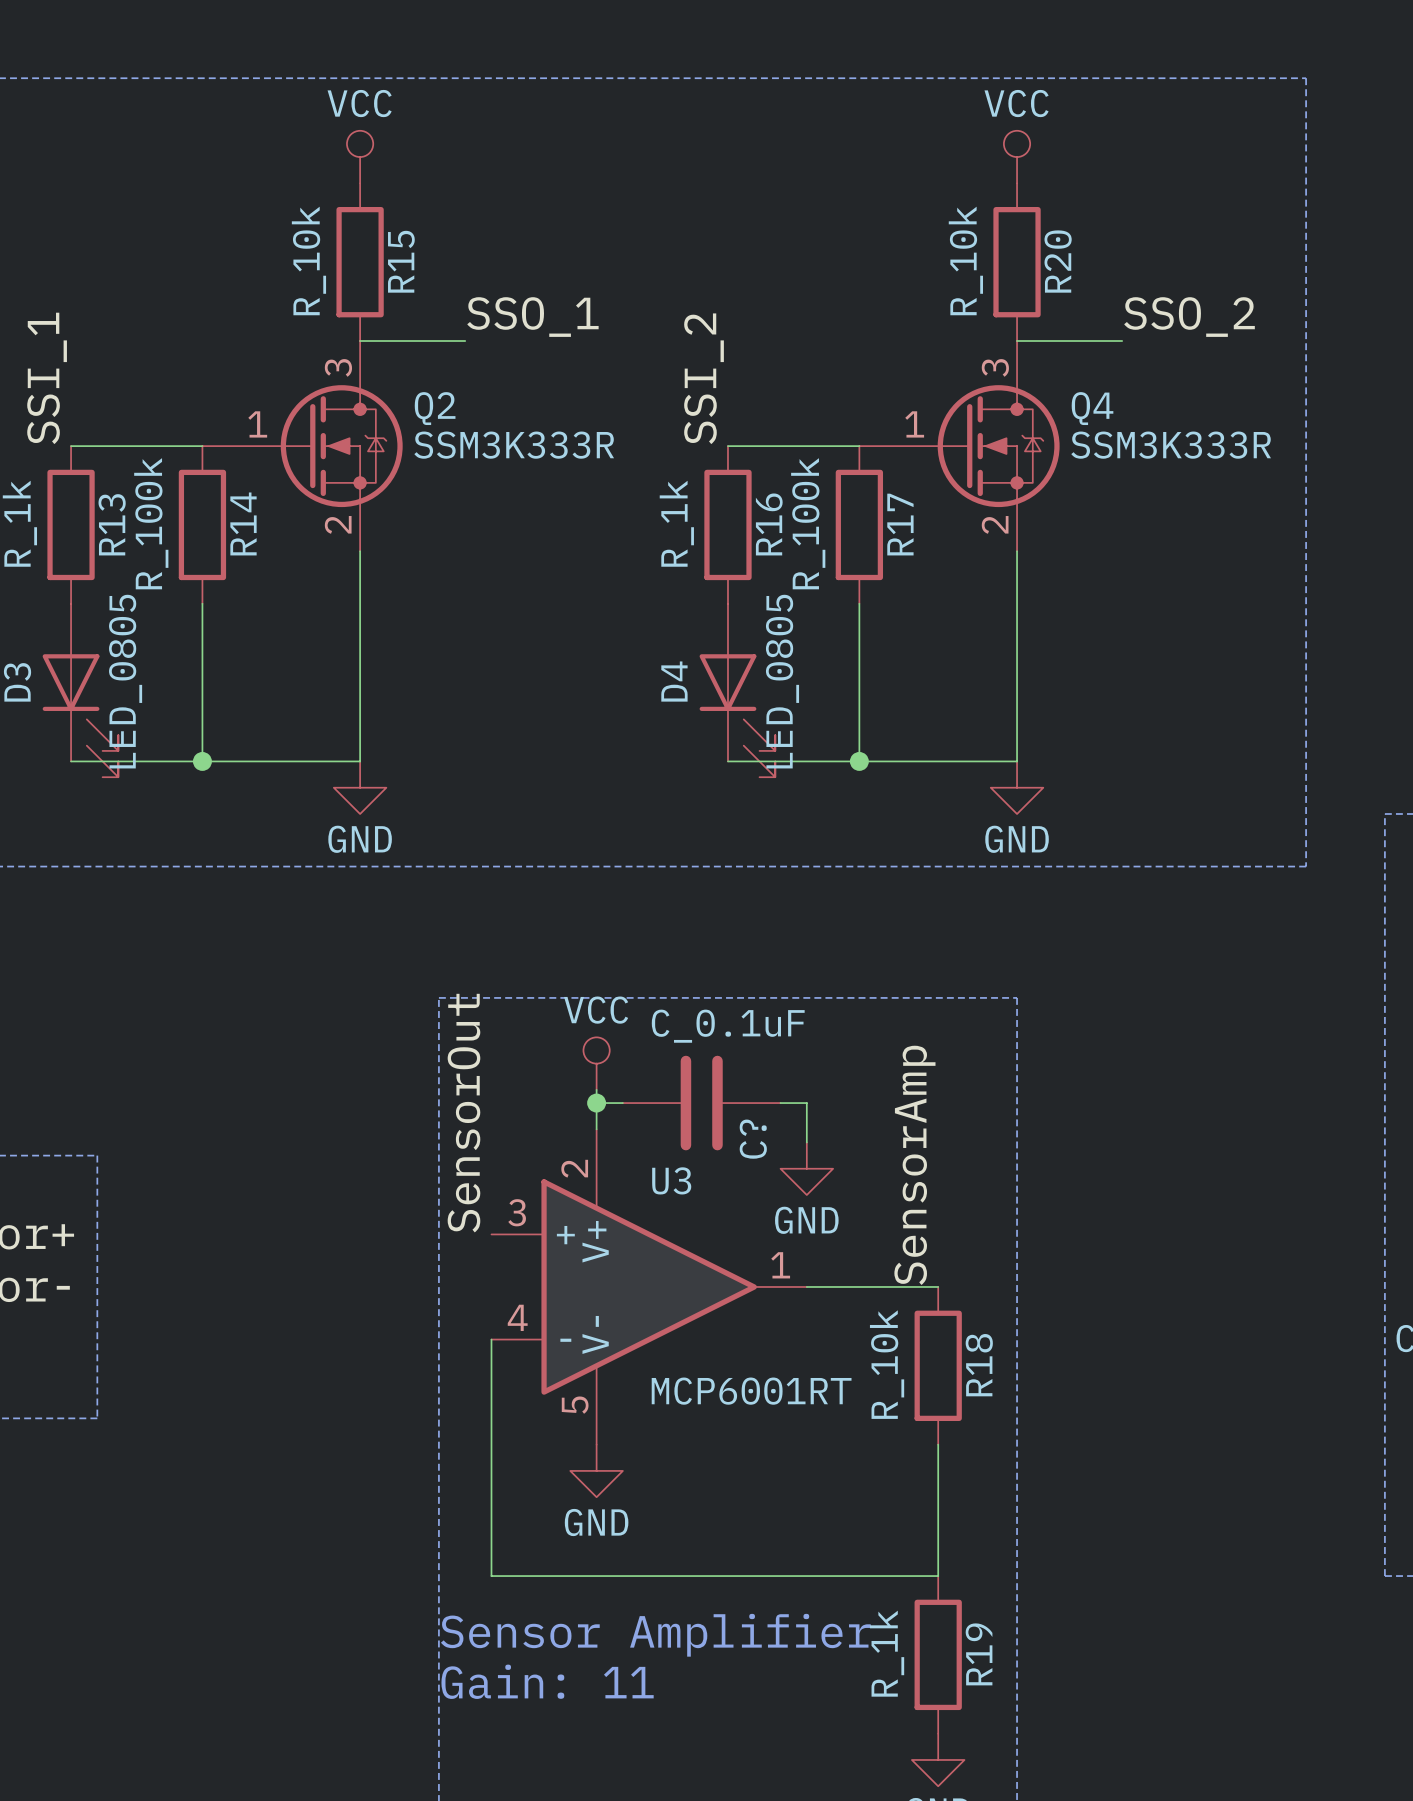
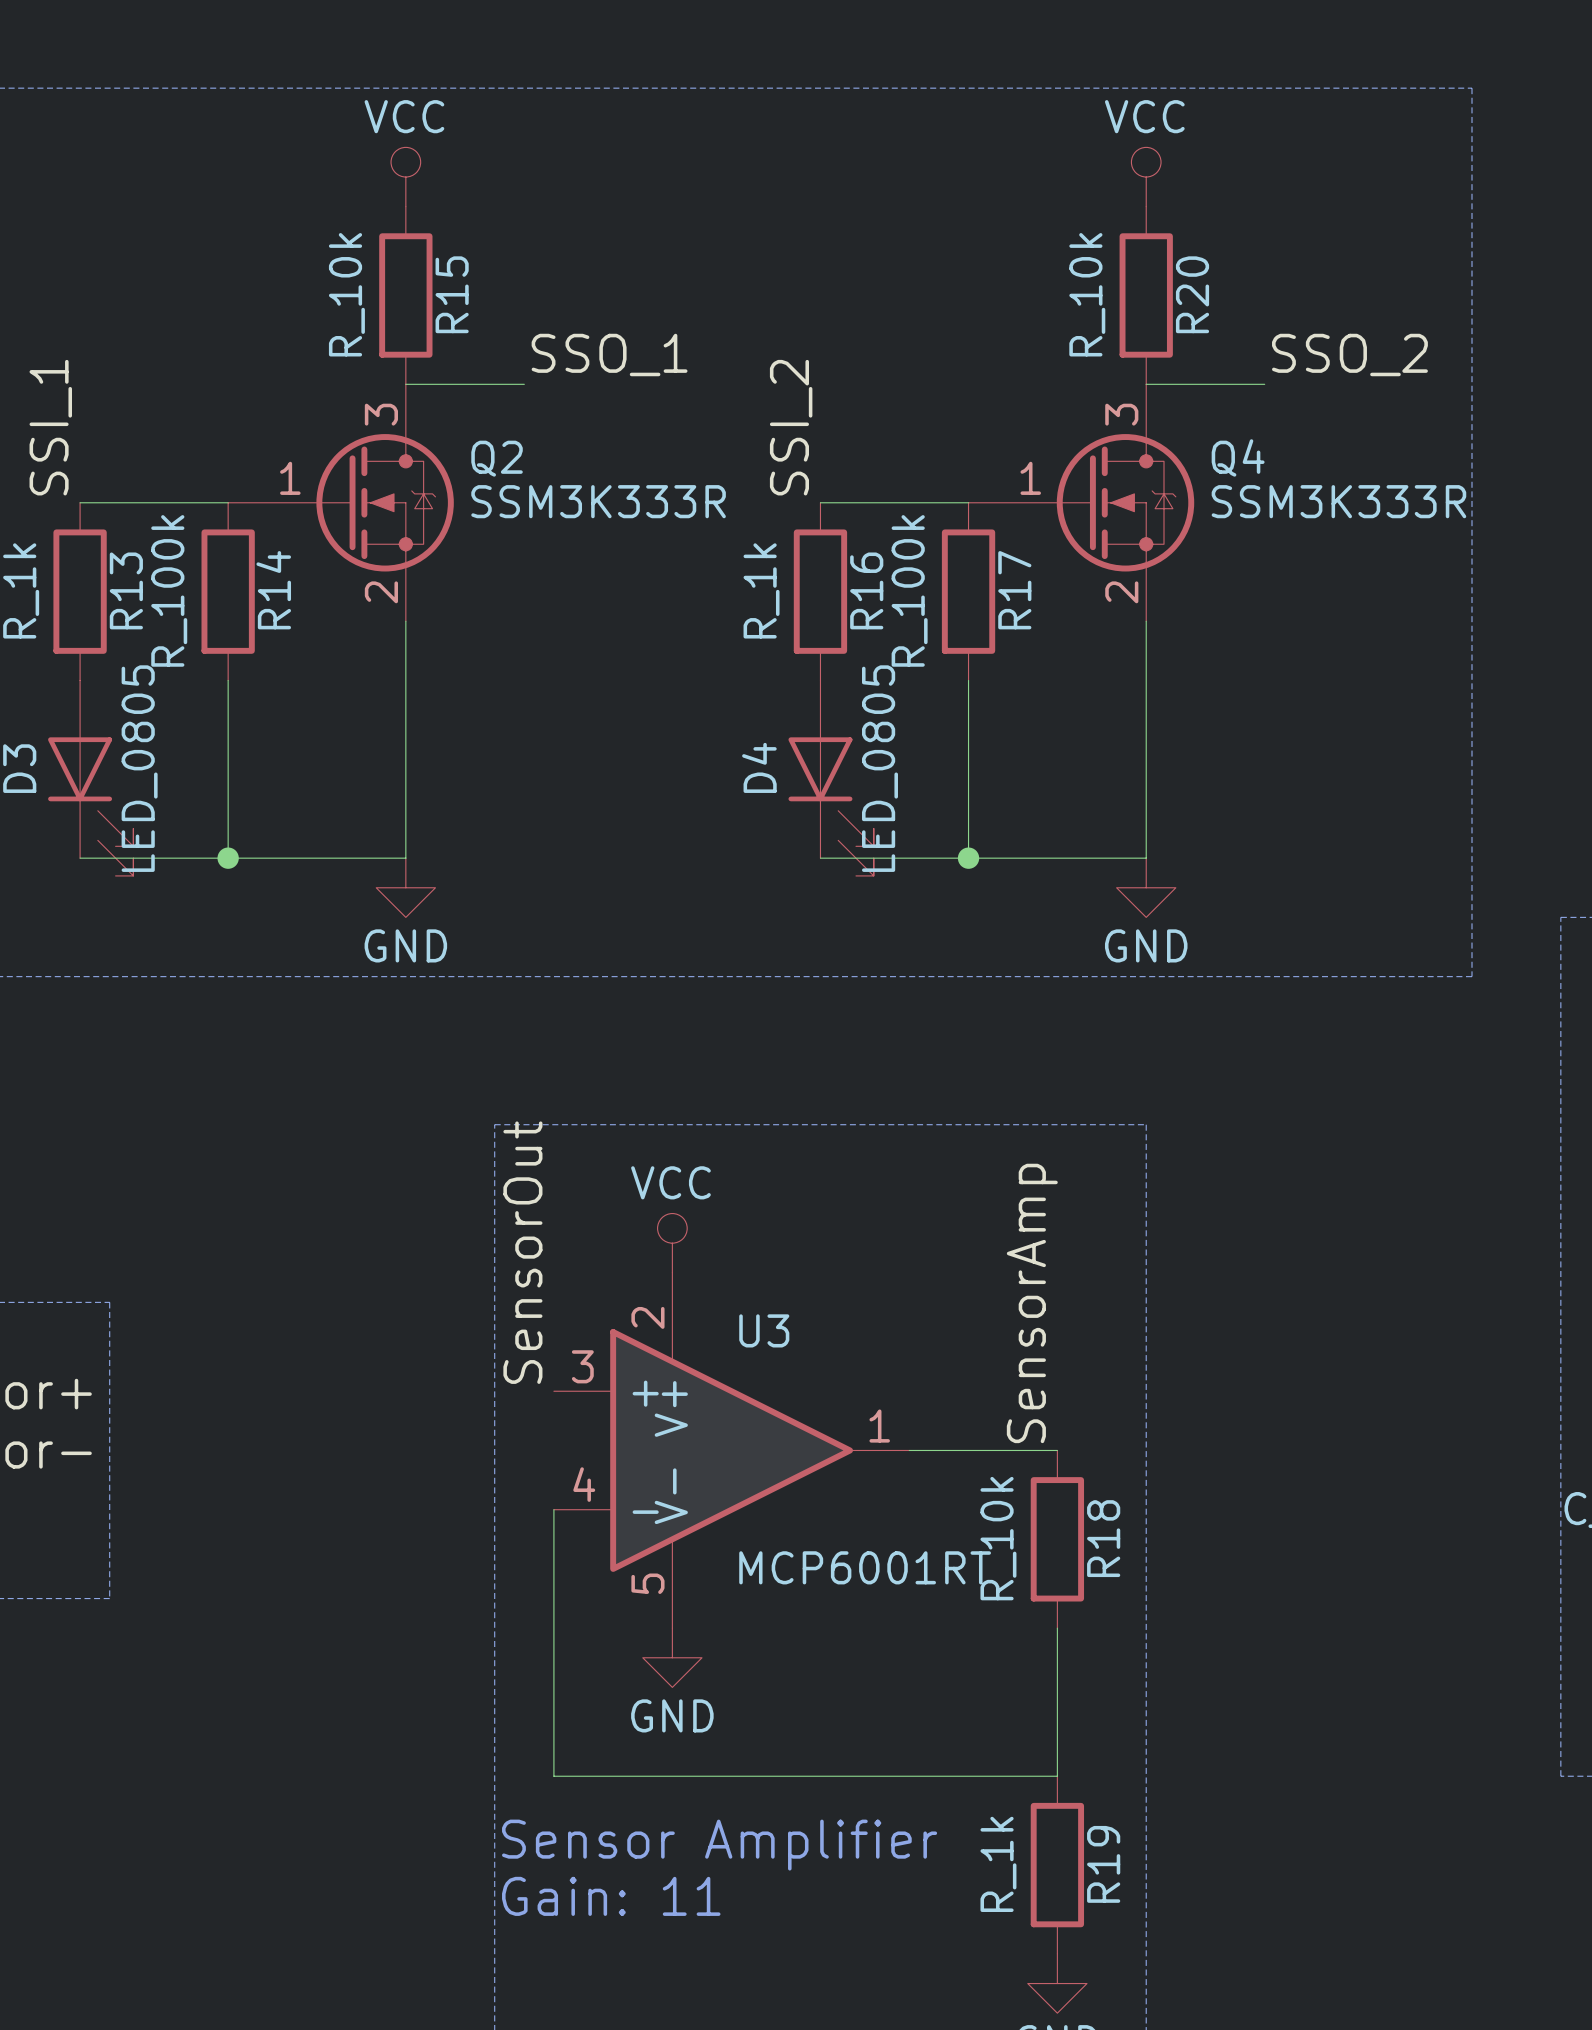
power symbol position: VCC (596, 1063) -> VCC (672, 1243)
wire: (596, 1103) (622, 1103) -> none
junction: (596, 1103) -> none
C?: C_0.1uF (701, 1103) -> none
wire: (780, 1103) (806, 1103) (806, 1142) -> none
power symbol: GND (806, 1168) -> none

